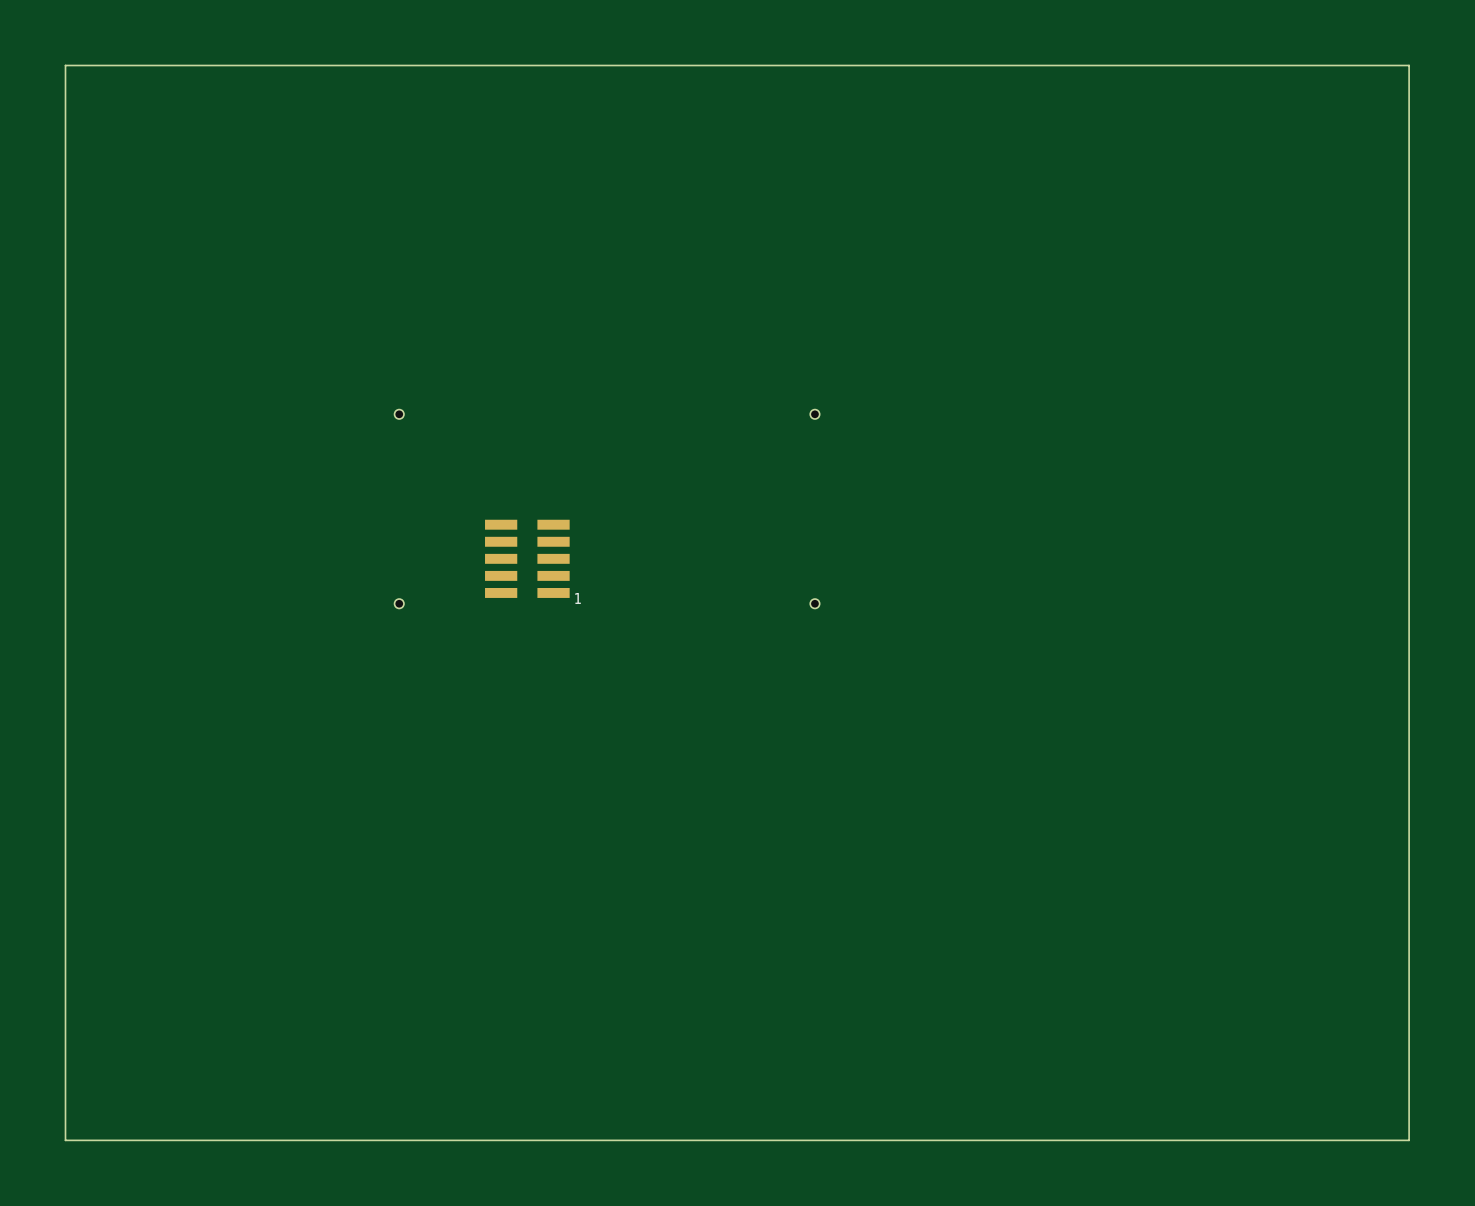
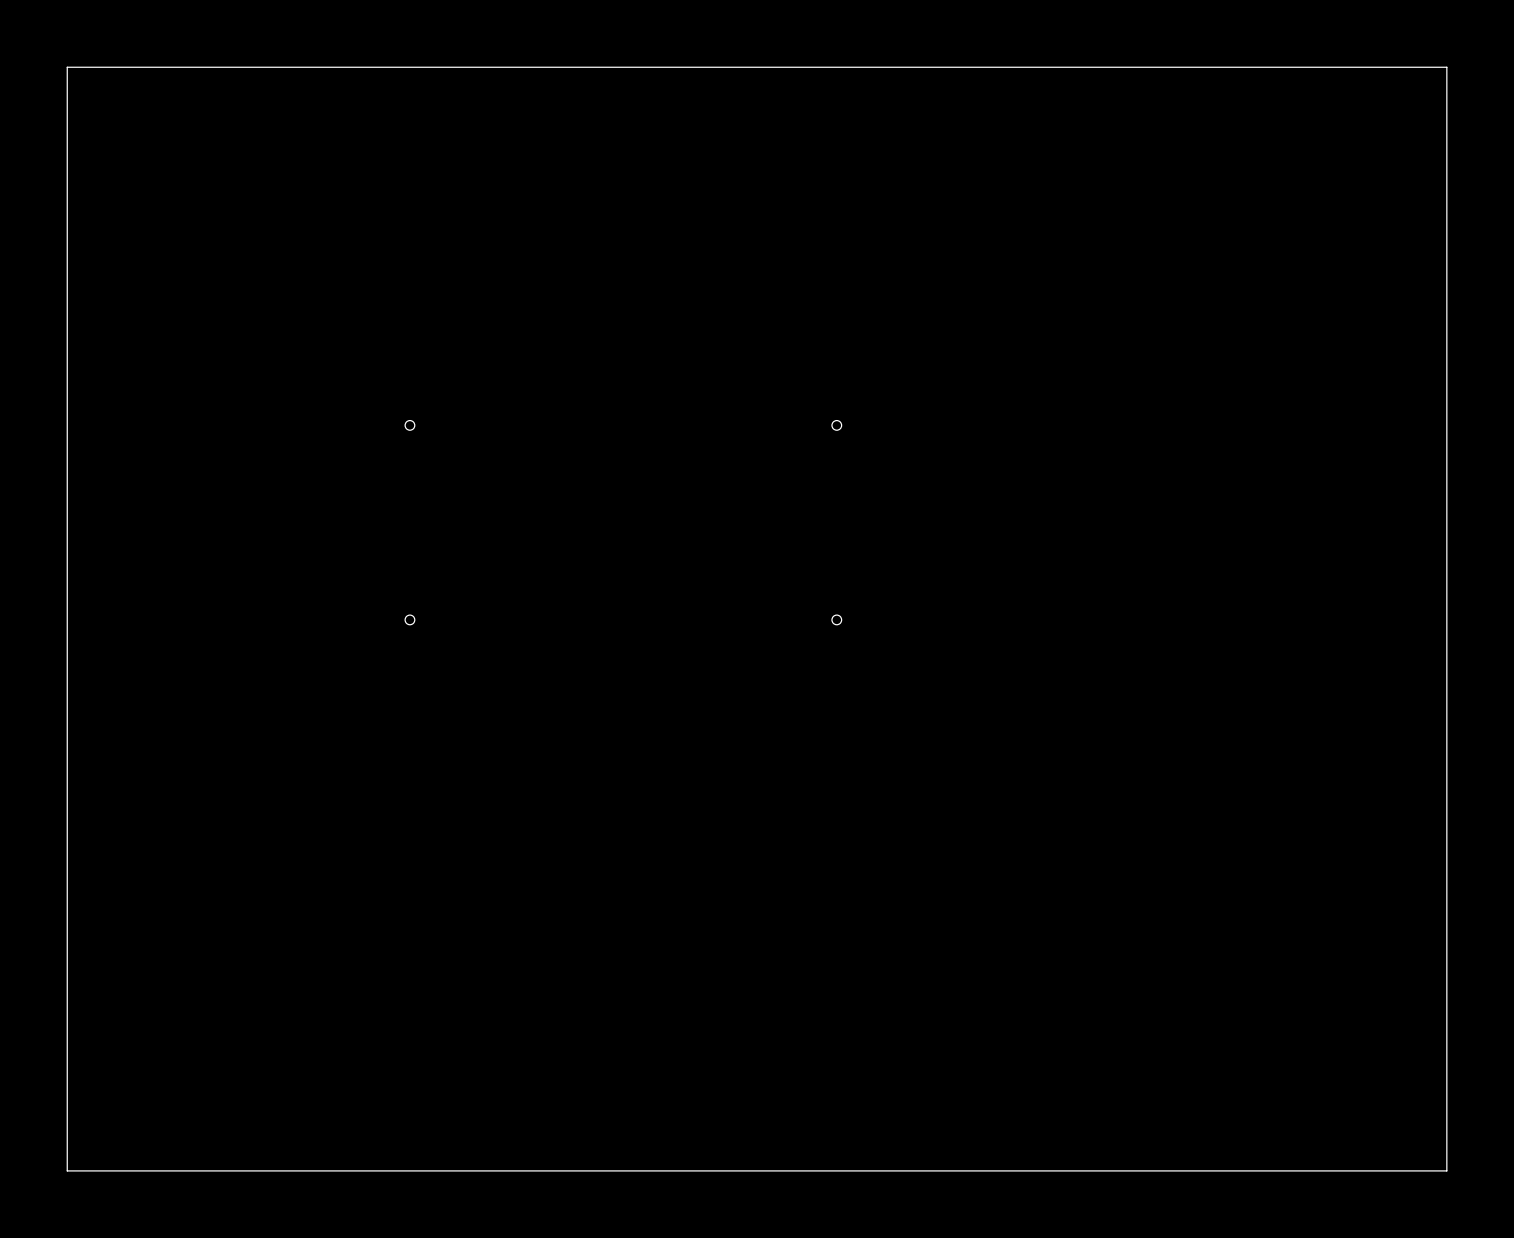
part: (527, 558) -> none

